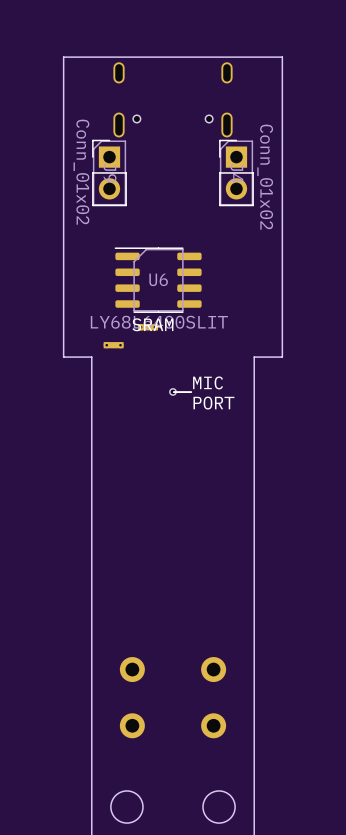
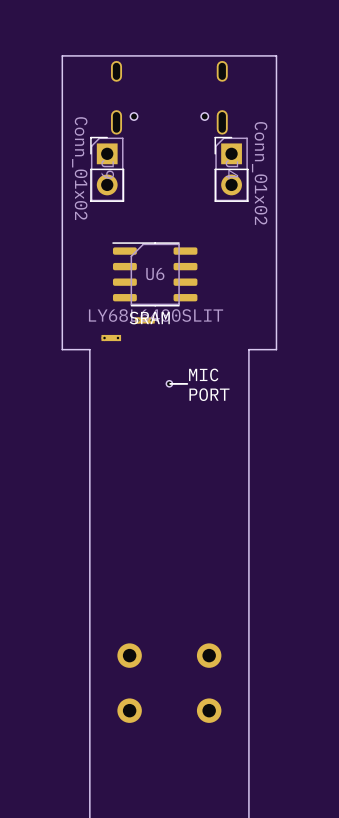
round board edge: [110, 790, 144, 824] -> none
round board edge: [202, 790, 236, 824] -> none

